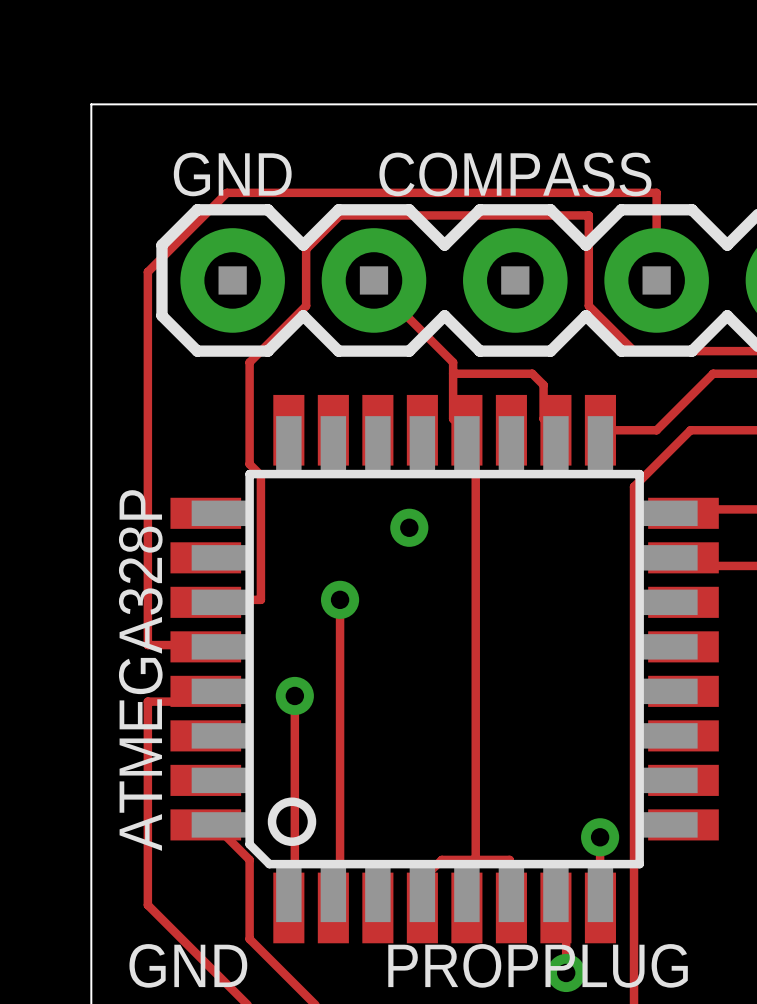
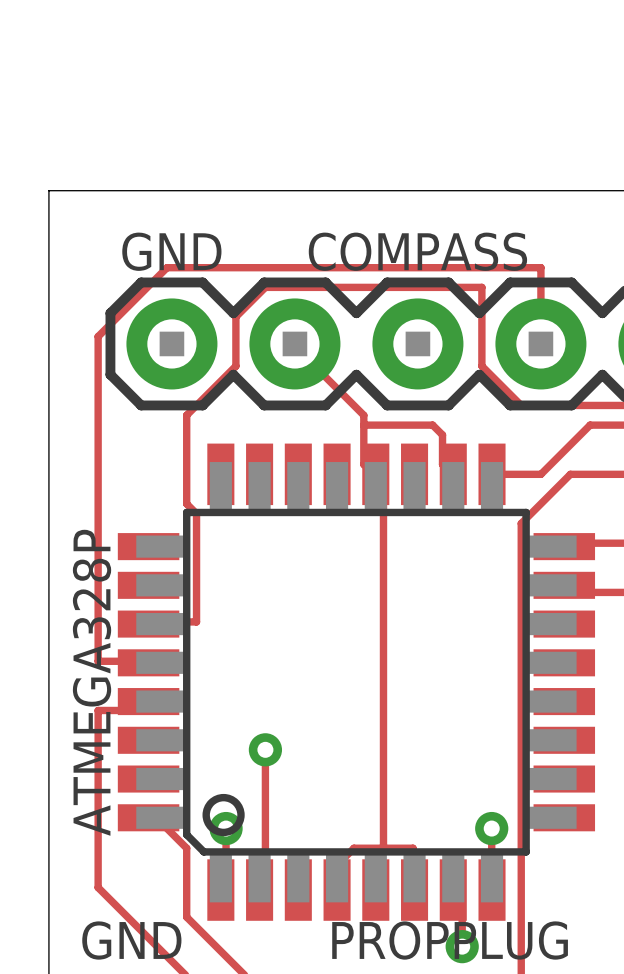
via: (409, 527) -> none
track: (340, 599) (340, 746) -> none
via: (340, 599) -> none
track: (294, 695) (294, 837) -> none
via position: (294, 695) -> (265, 749)
via: none -> (226, 828)

